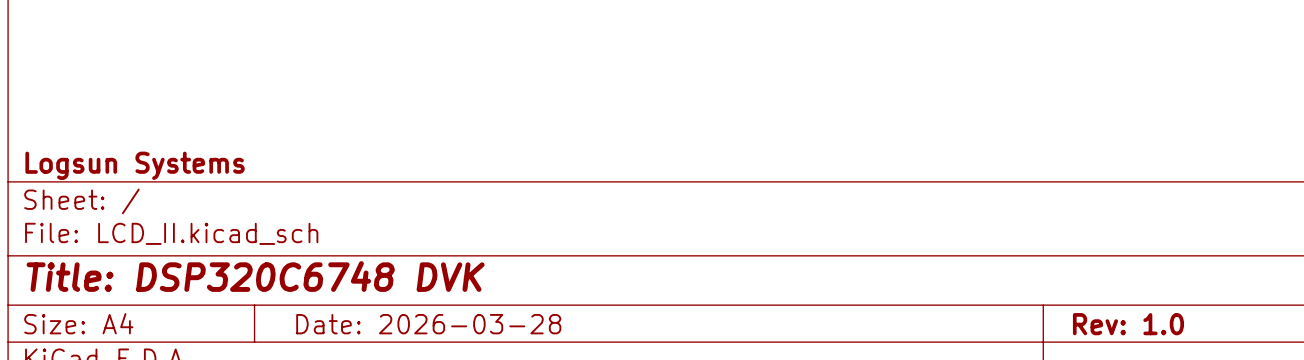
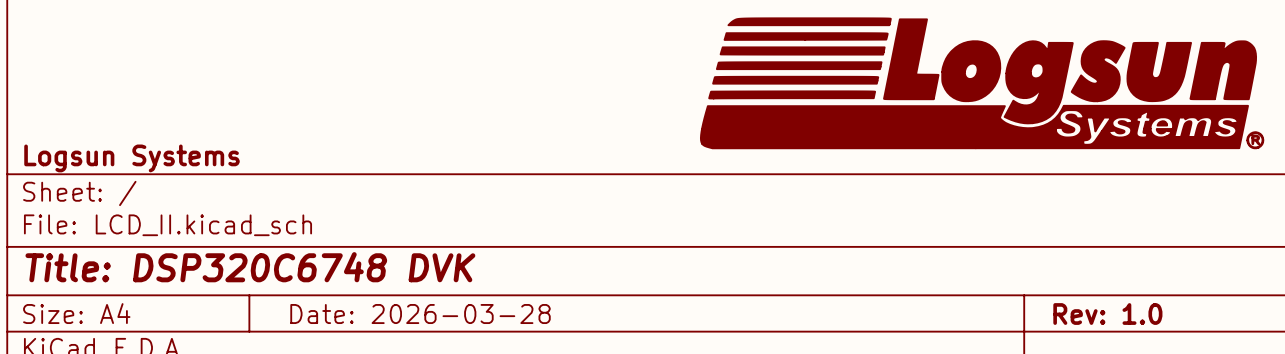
power symbol: none -> (982, 83)

